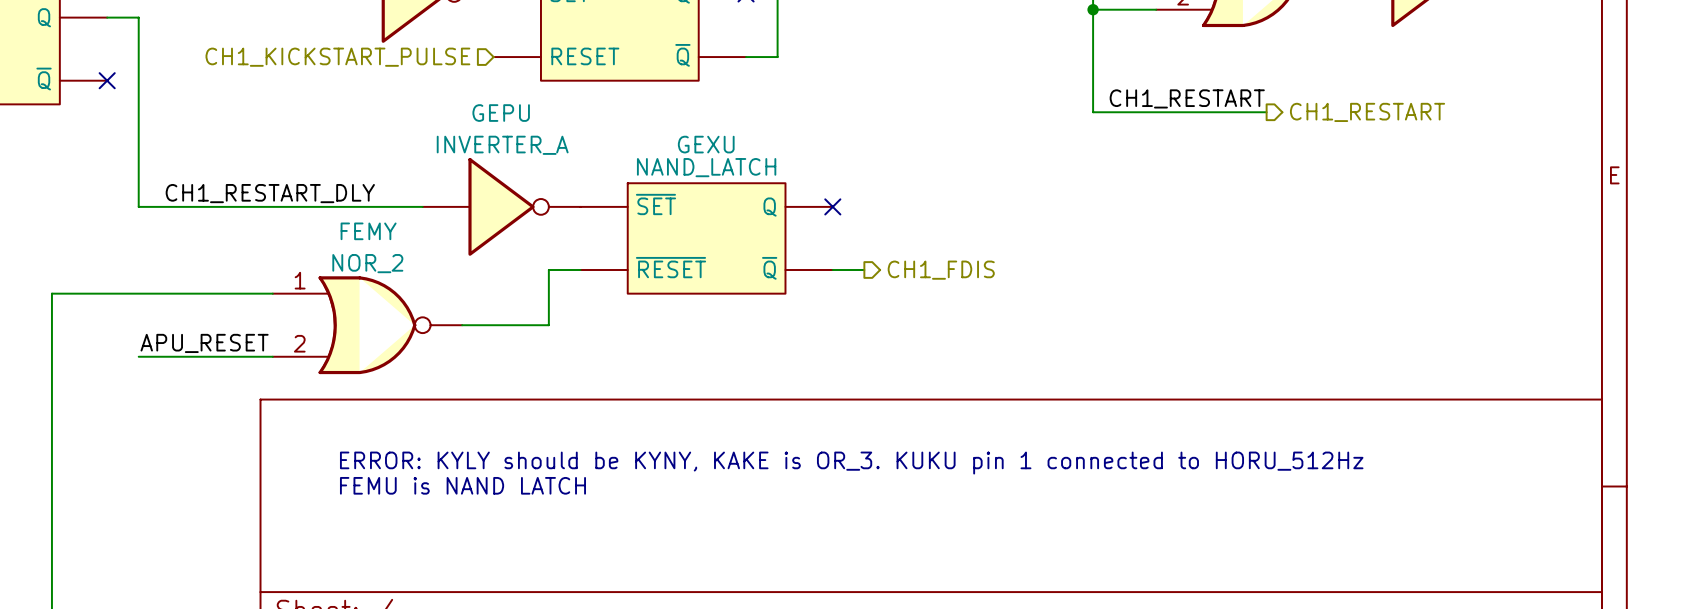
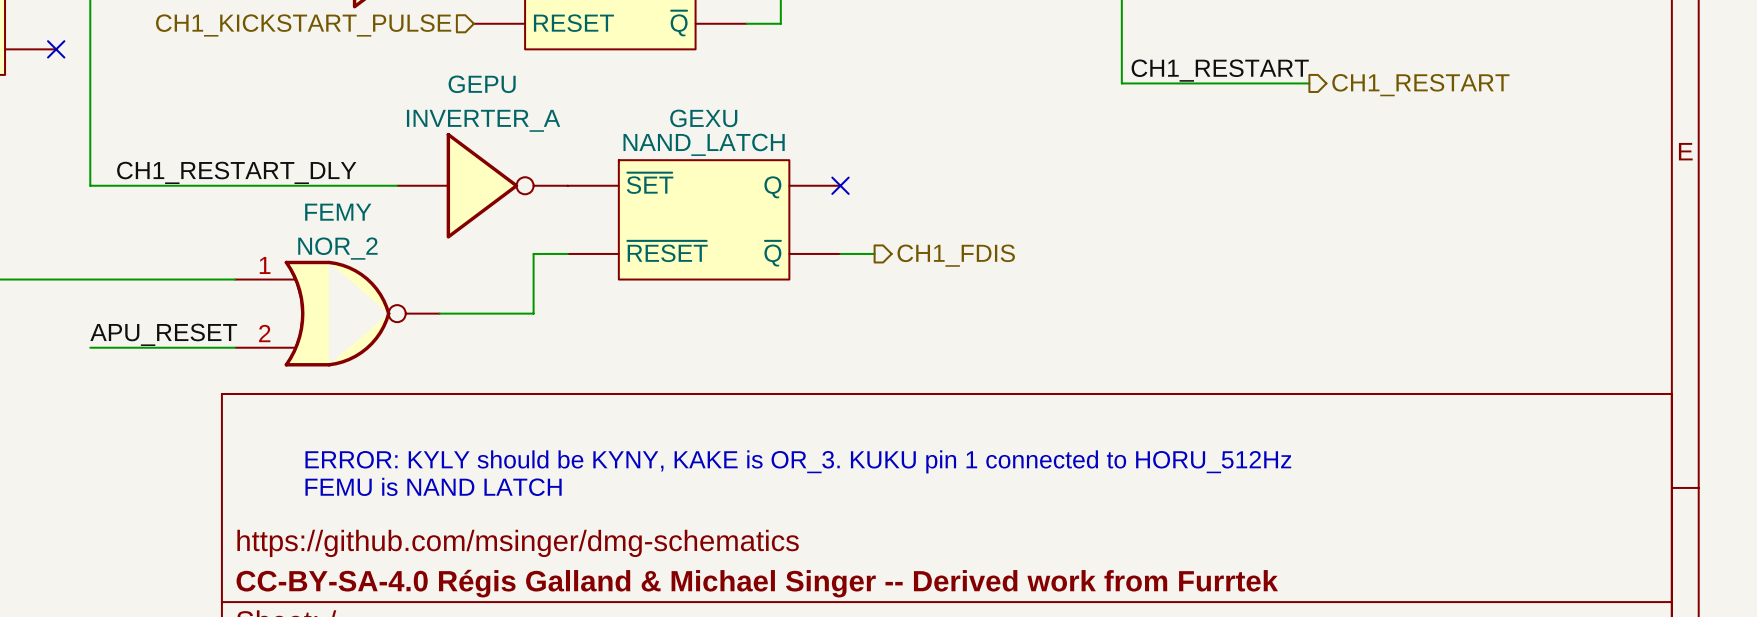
title block: none -> https://github.com/msinger/dmg-schematics (518, 543)
title block: none -> CC-BY-SA-4.0 Régis Galland & Michael Singer -- Derived work from Furrtek (757, 583)

